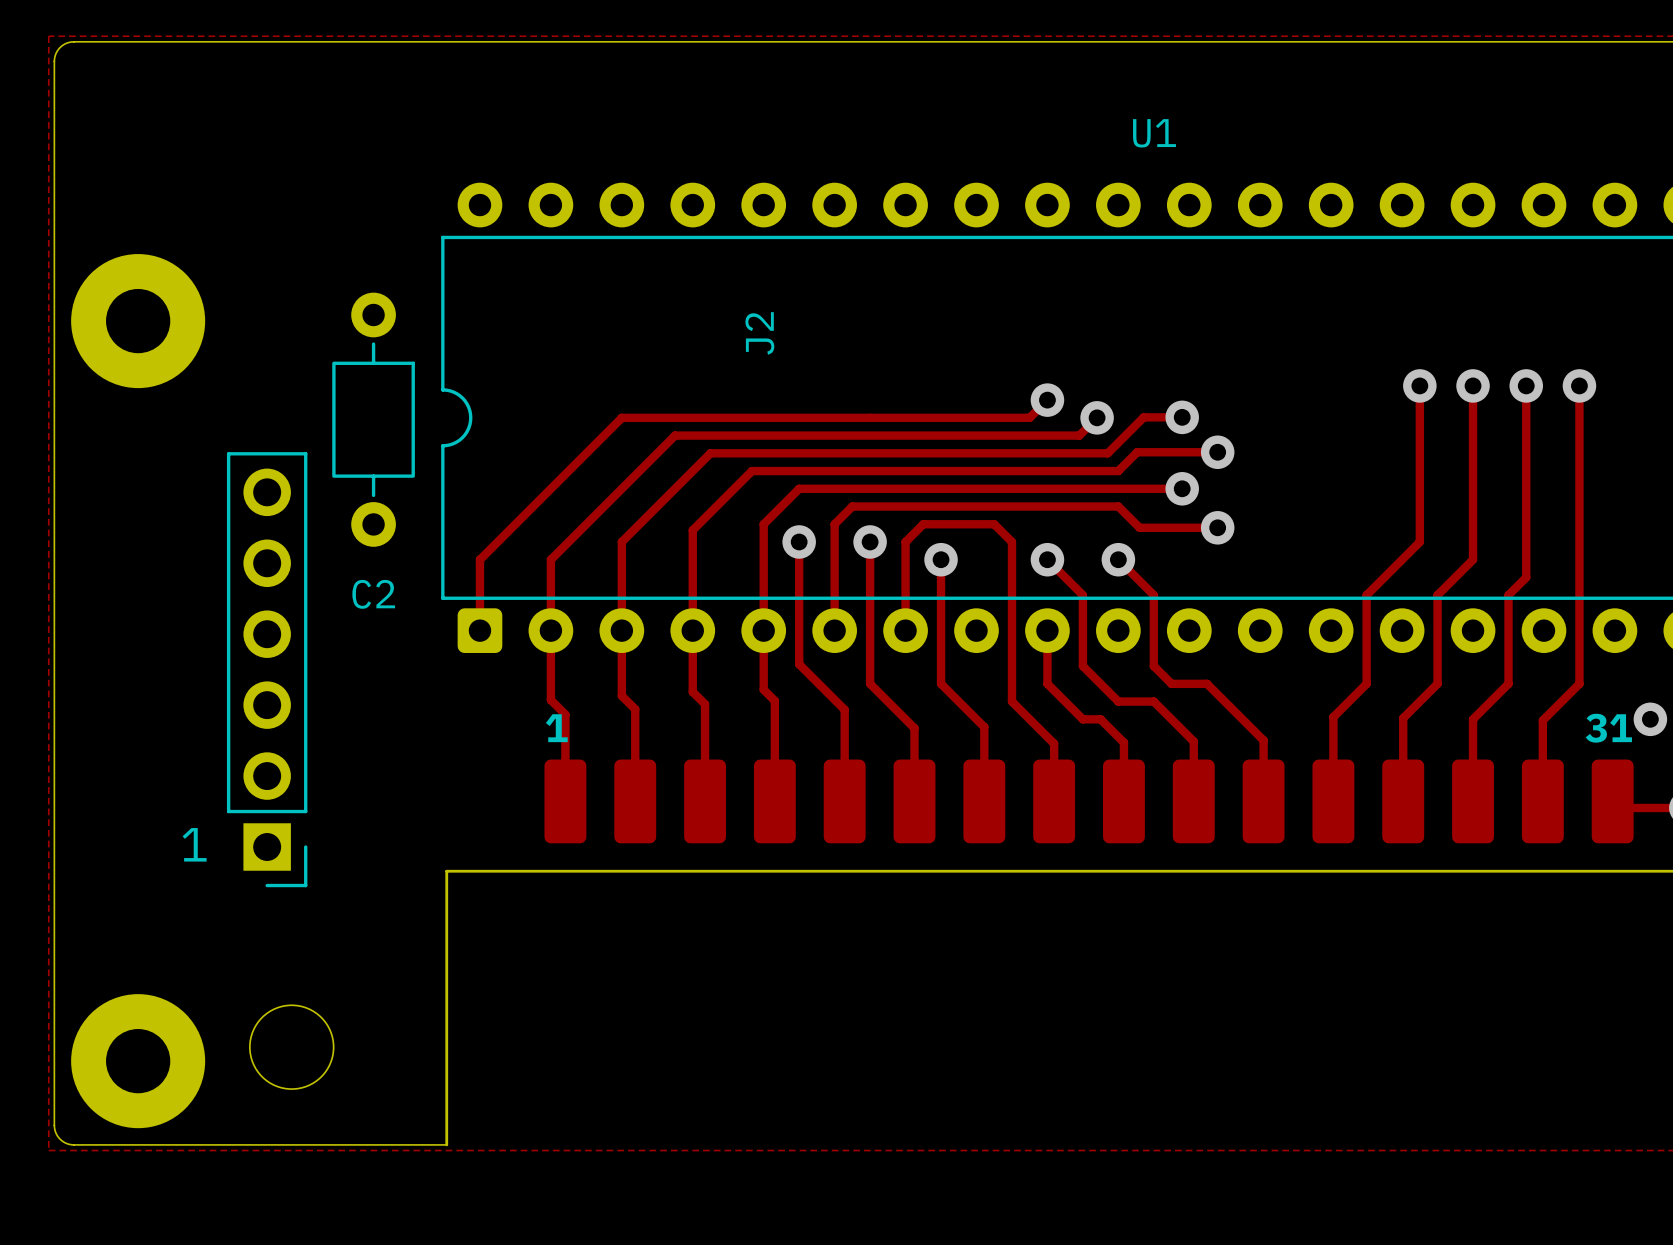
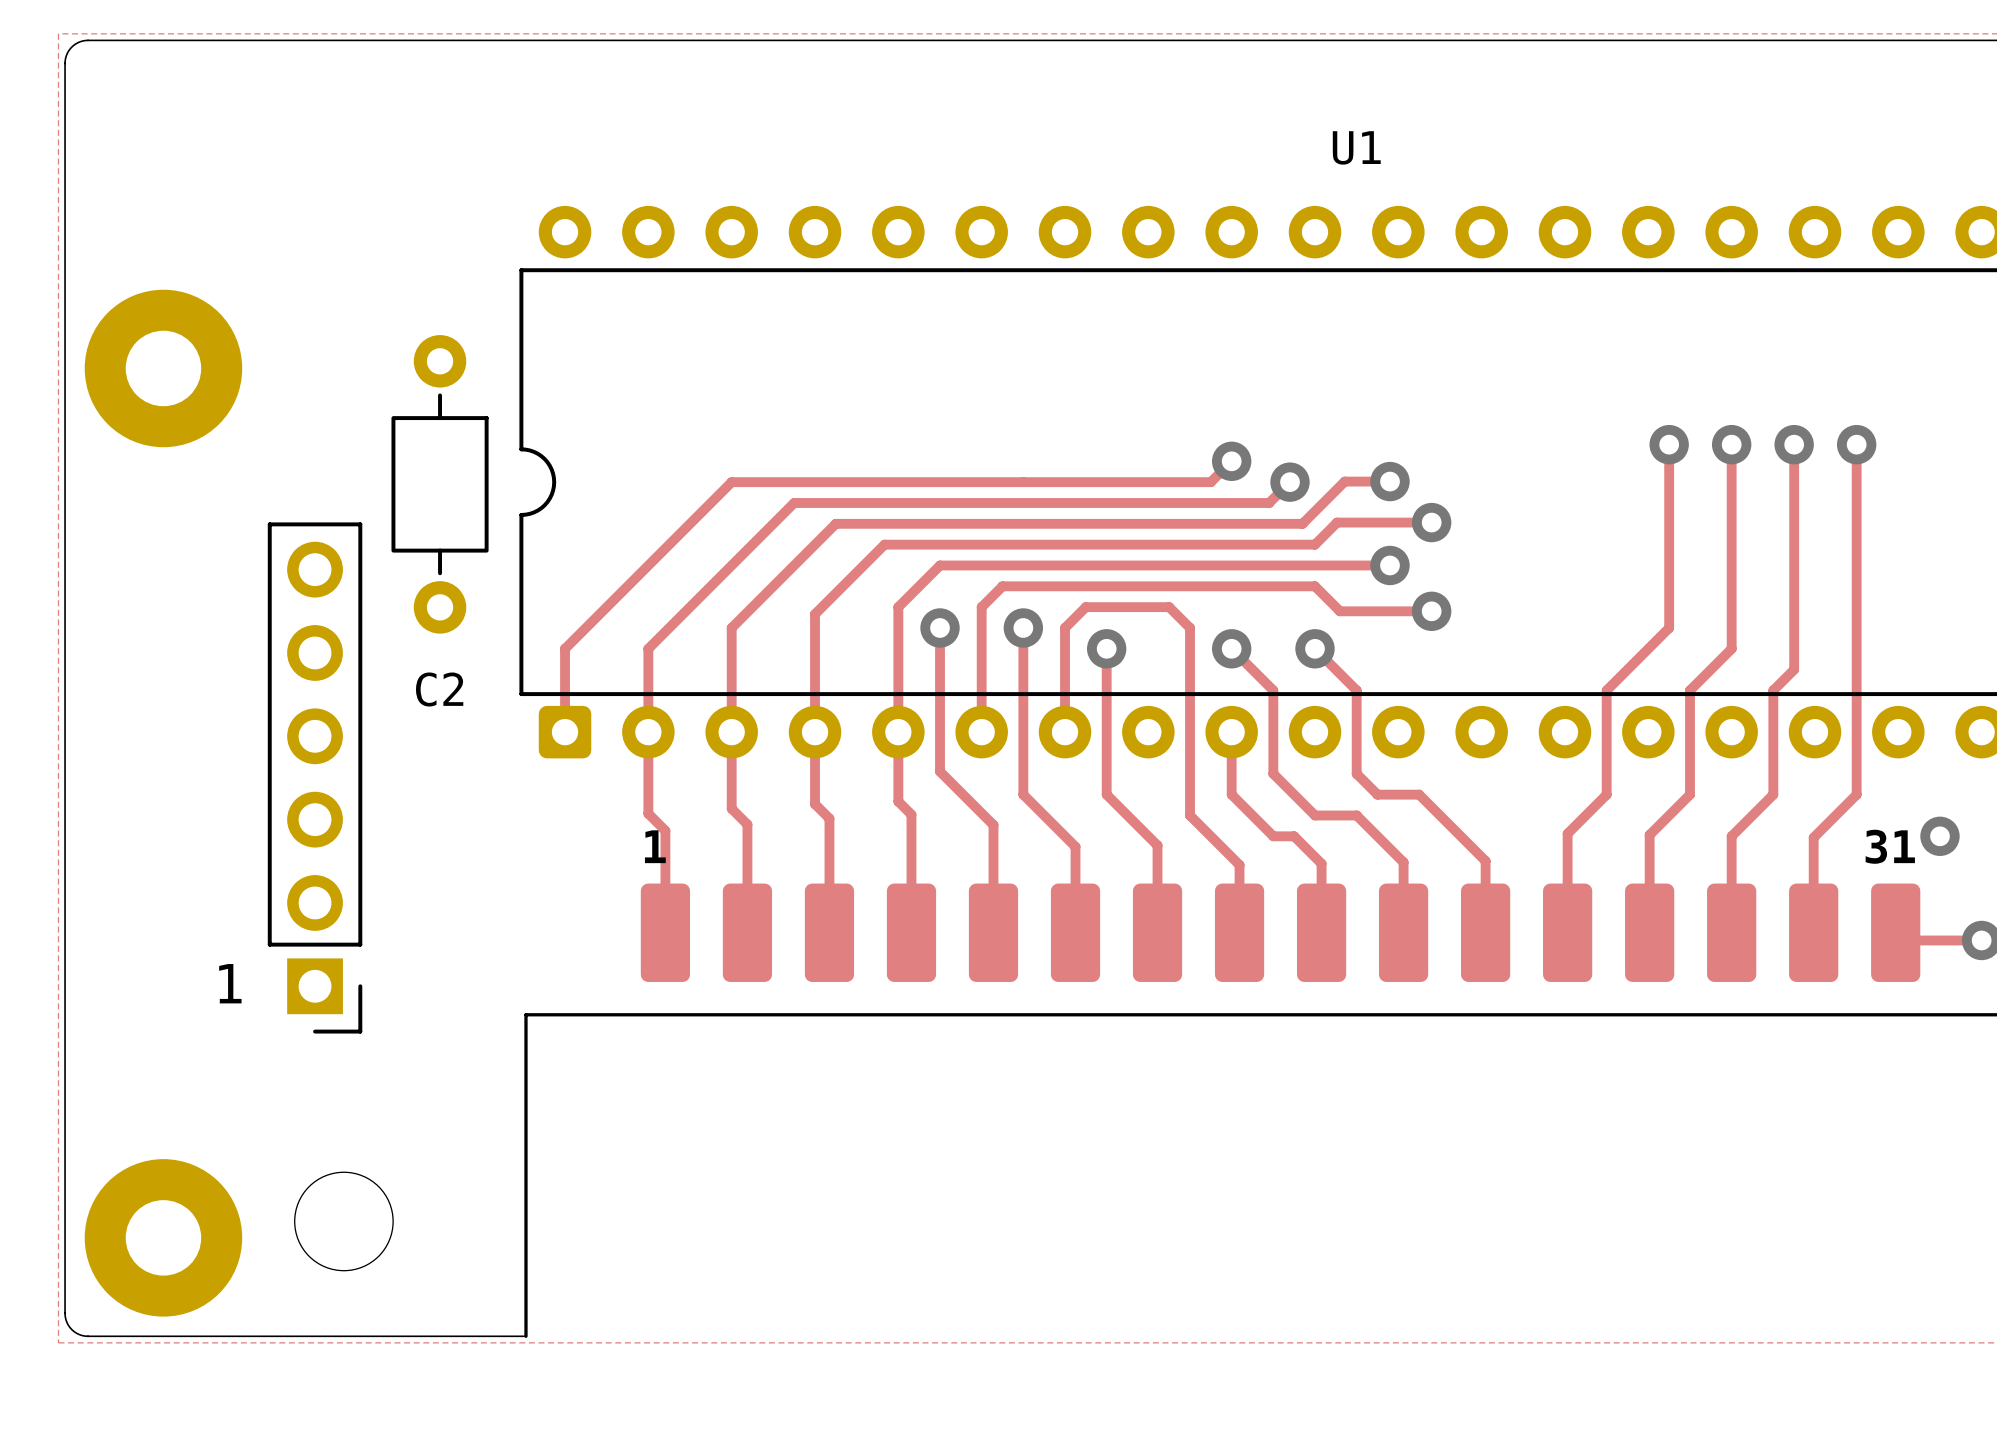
J2 name: J2 (759, 333) -> none

